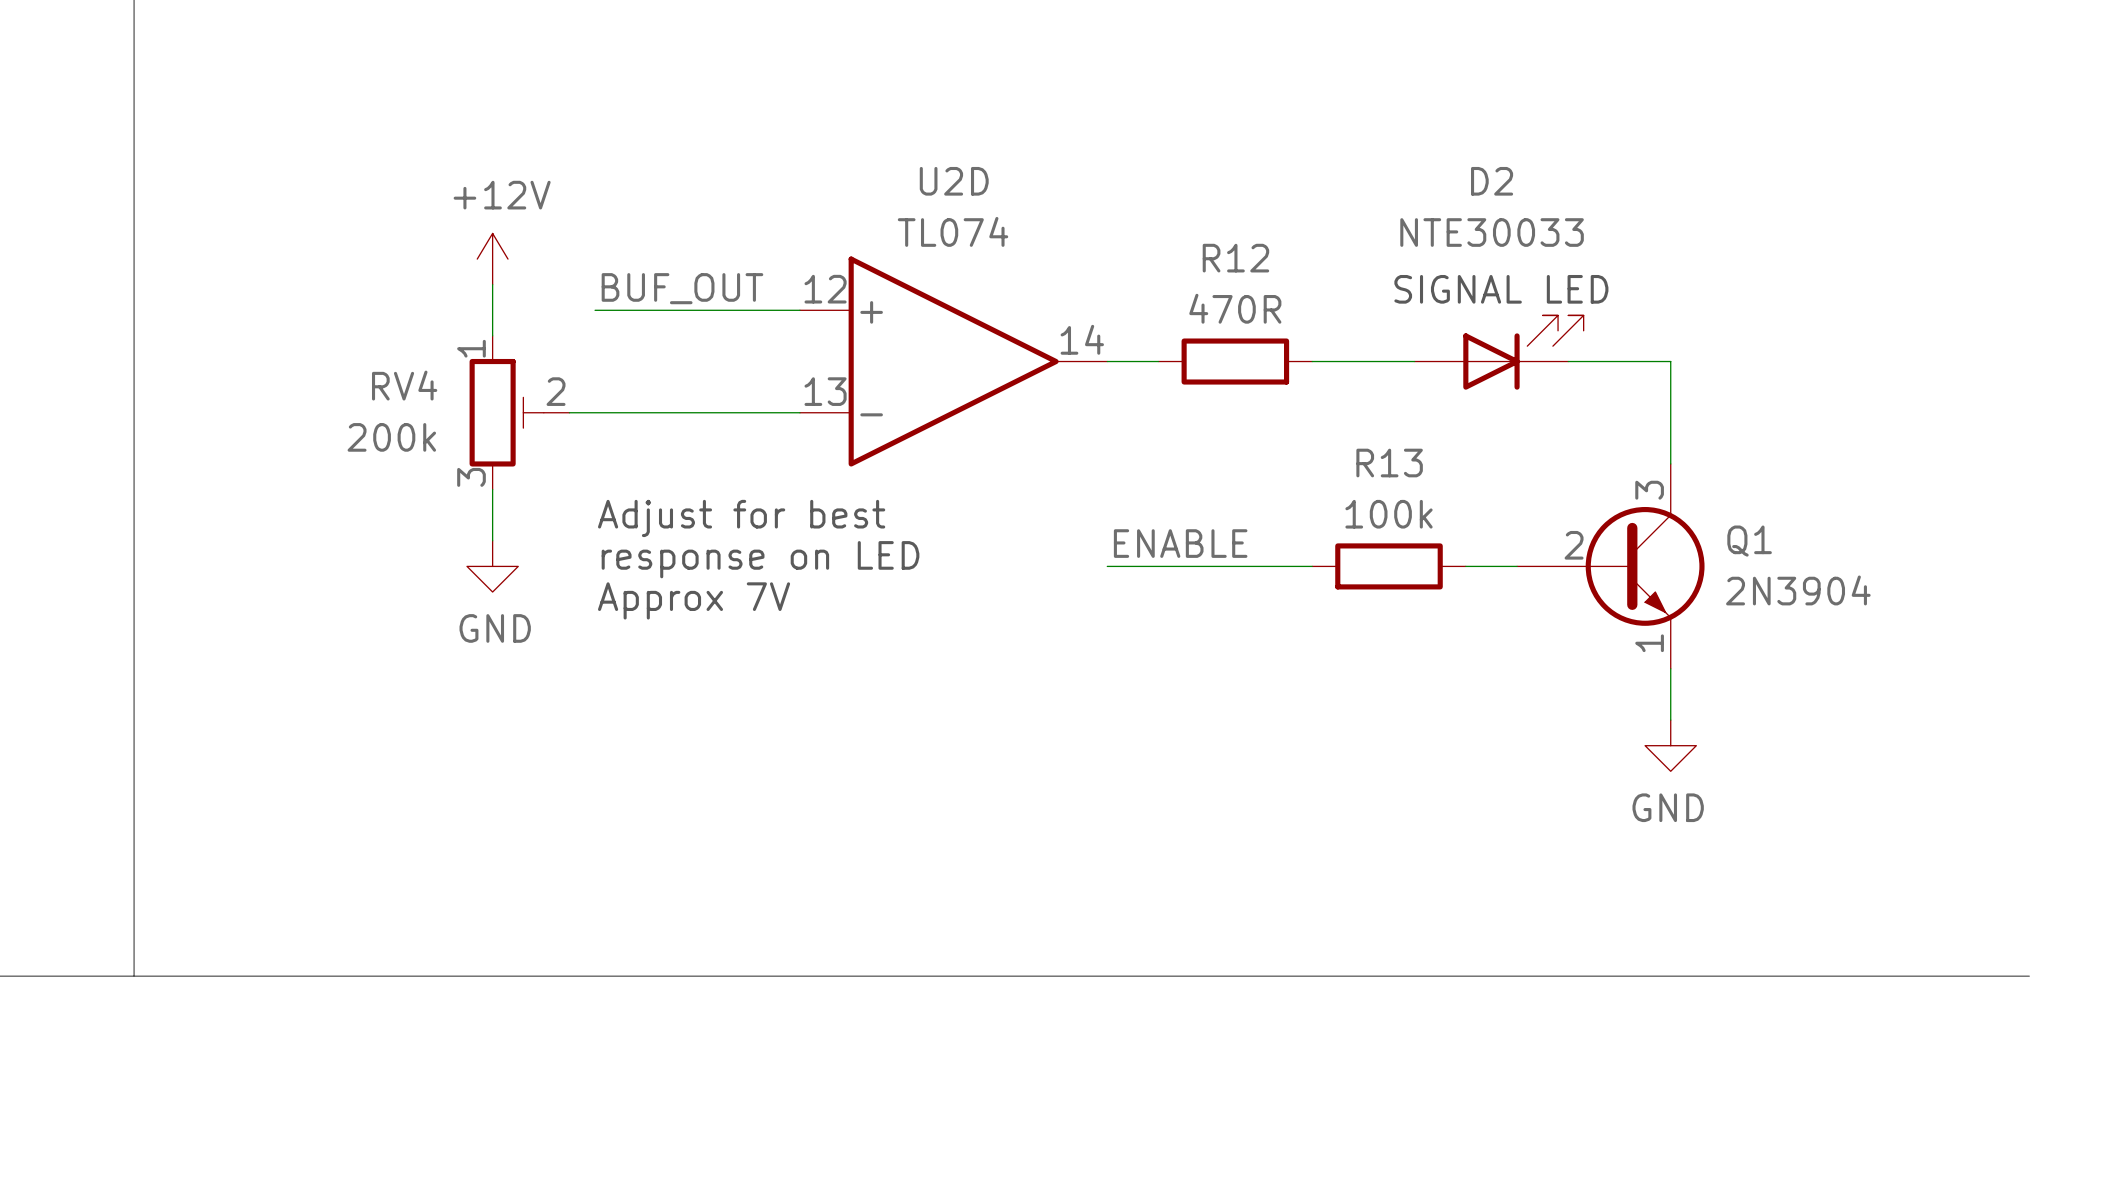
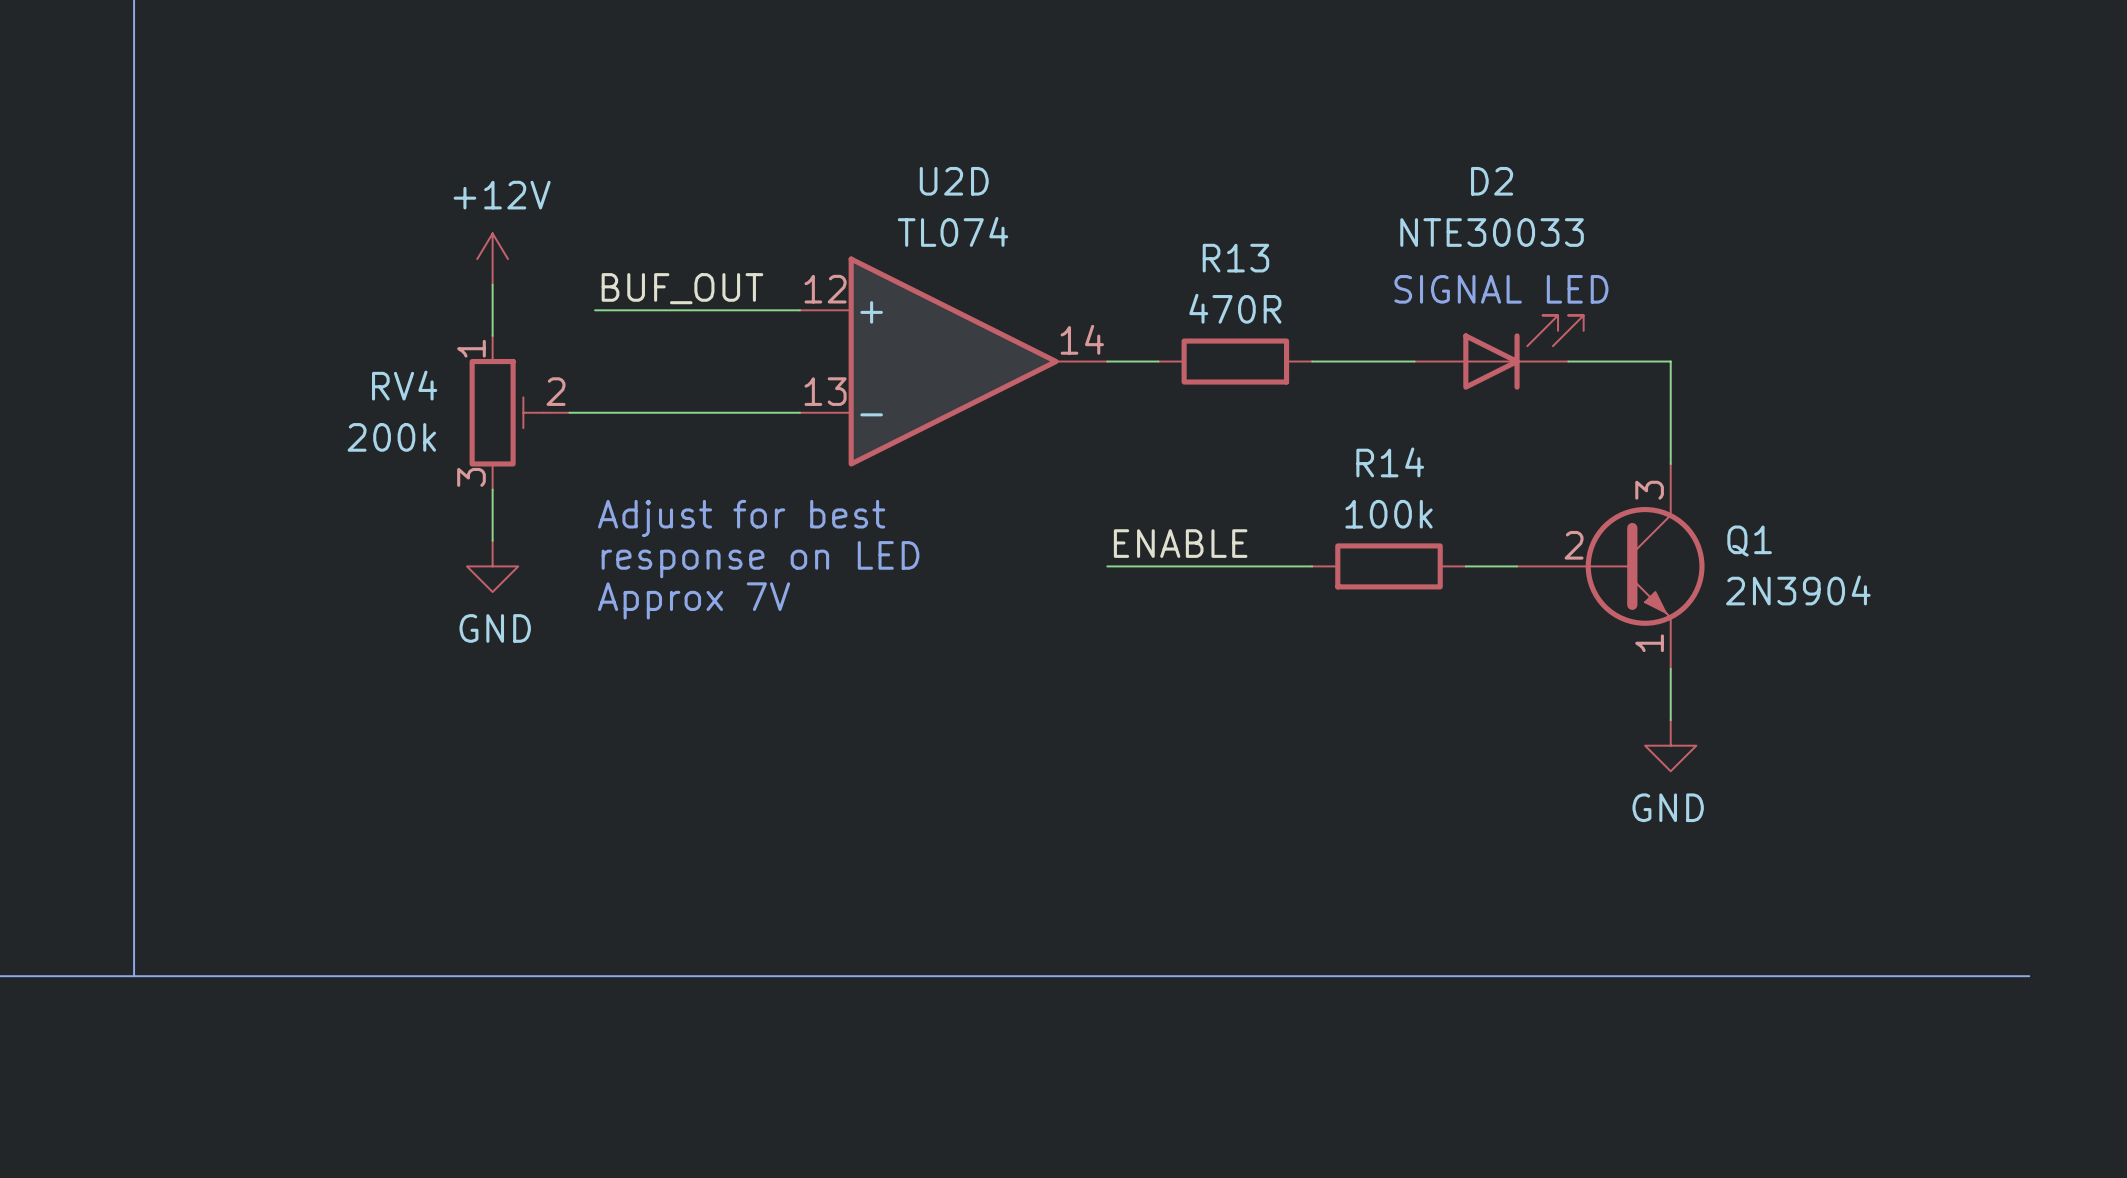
R12 name: R12 (1235, 258) -> R13 (1235, 258)
R13 name: R13 (1389, 463) -> R14 (1390, 462)

